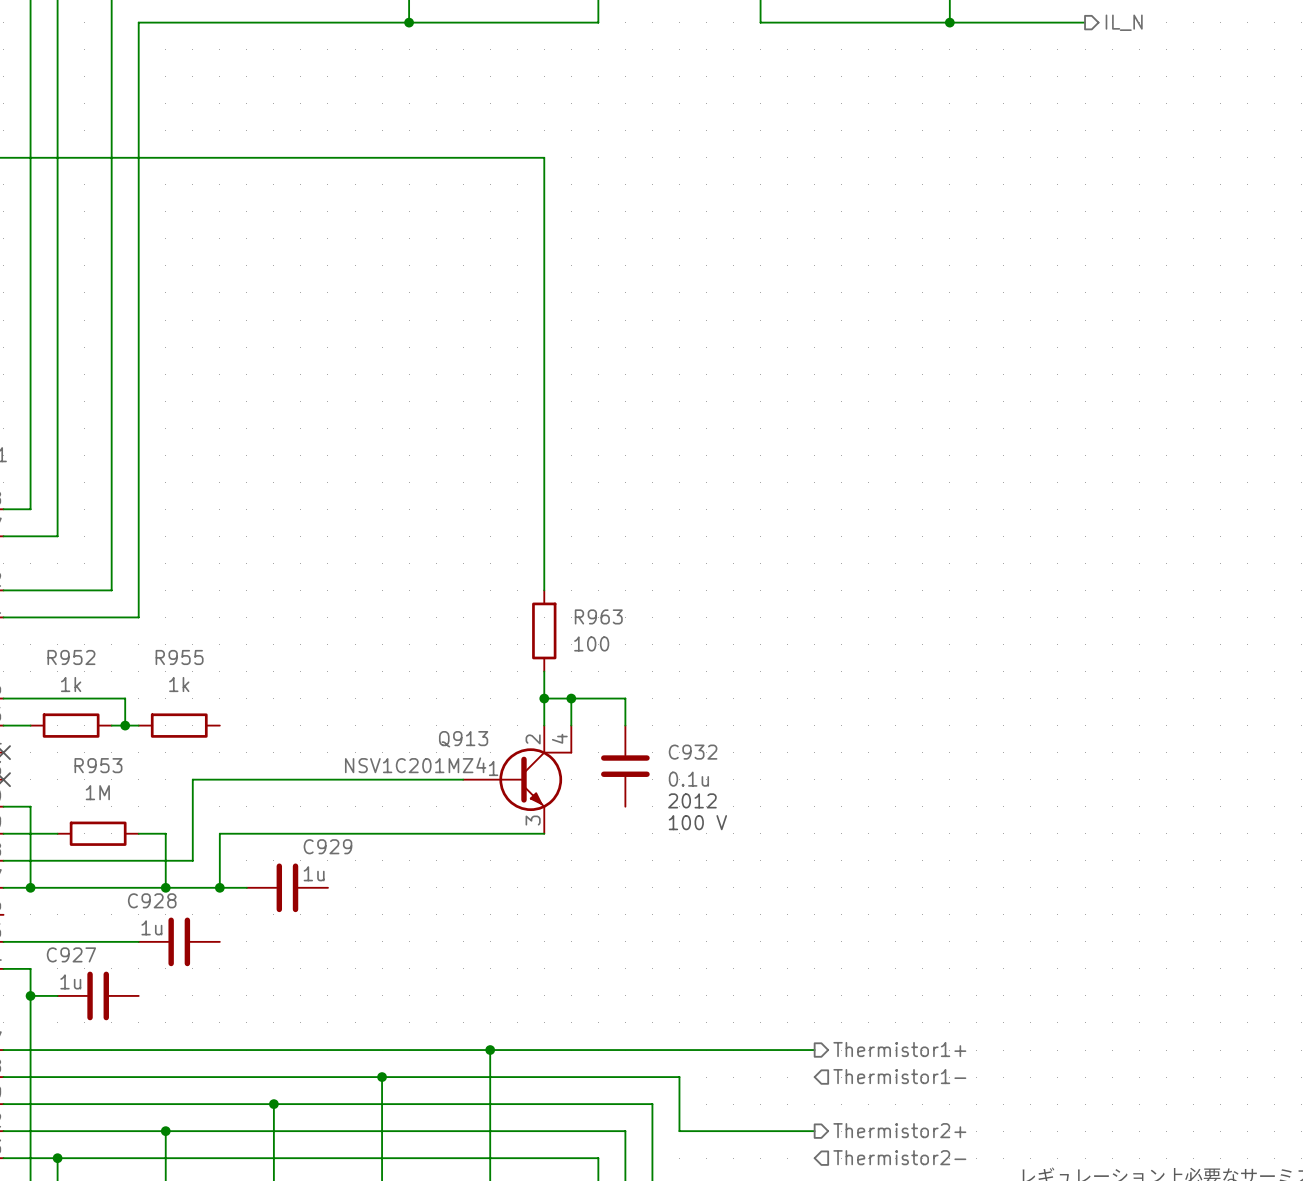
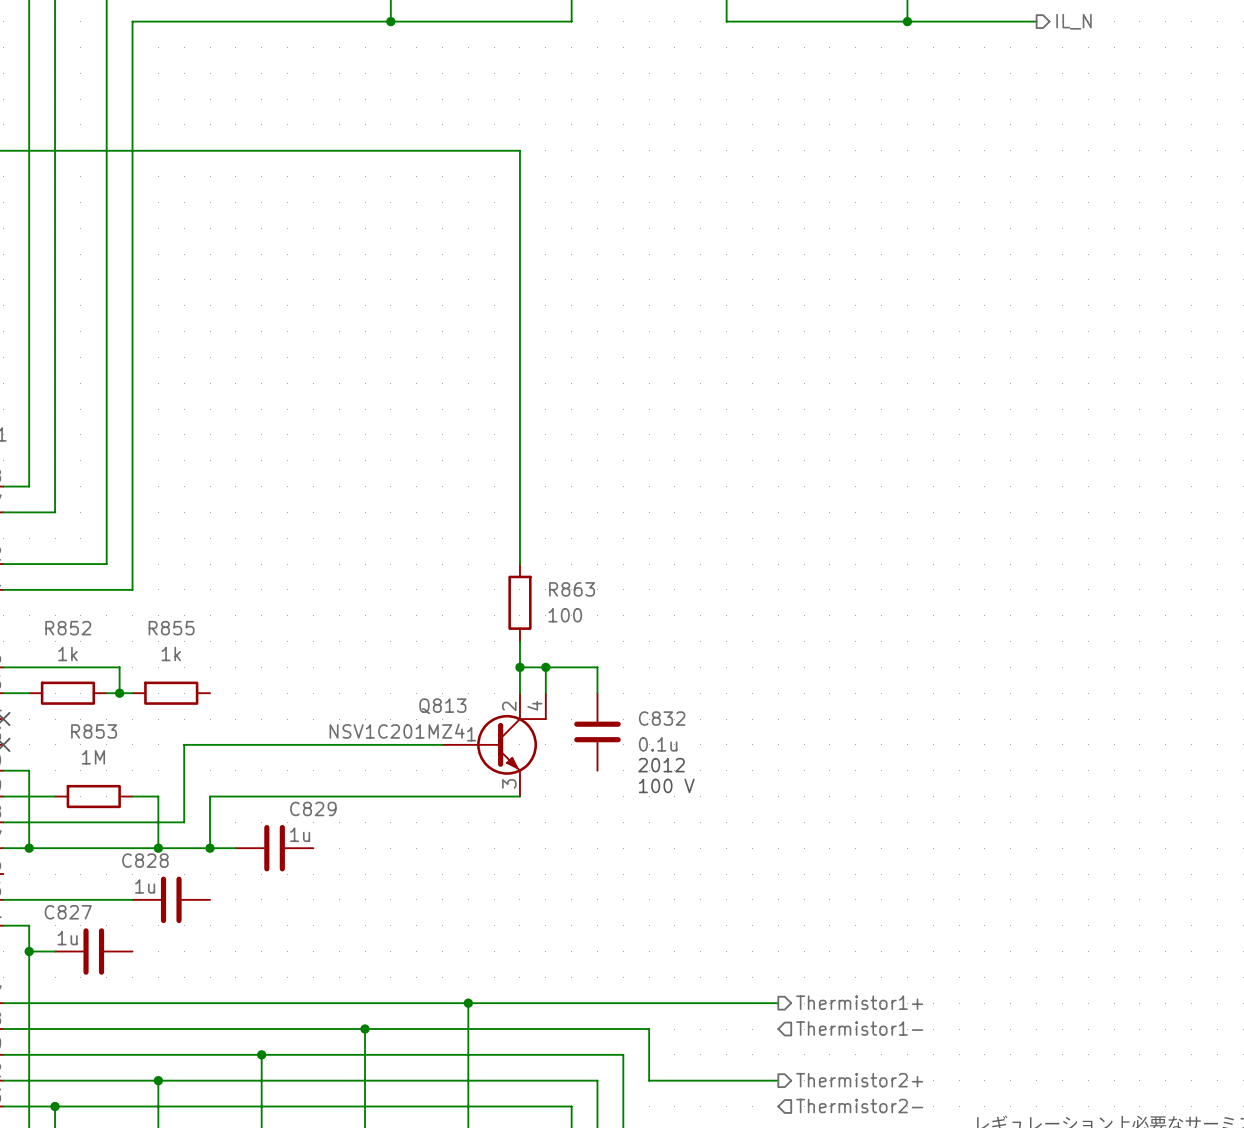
R963 name: R963 (598, 616) -> R863 (572, 589)
R952 name: R952 (71, 657) -> R852 (68, 628)
R955 name: R955 (179, 657) -> R855 (171, 628)
Q913 name: Q913 (463, 739) -> Q813 (442, 706)
C932 name: C932 (693, 752) -> C832 (662, 718)
R953 name: R953 (98, 765) -> R853 (94, 731)
C929 name: C929 (327, 846) -> C829 (313, 808)
C928 name: C928 (152, 900) -> C828 (145, 860)
C927 name: C927 (71, 954) -> C827 (68, 912)

